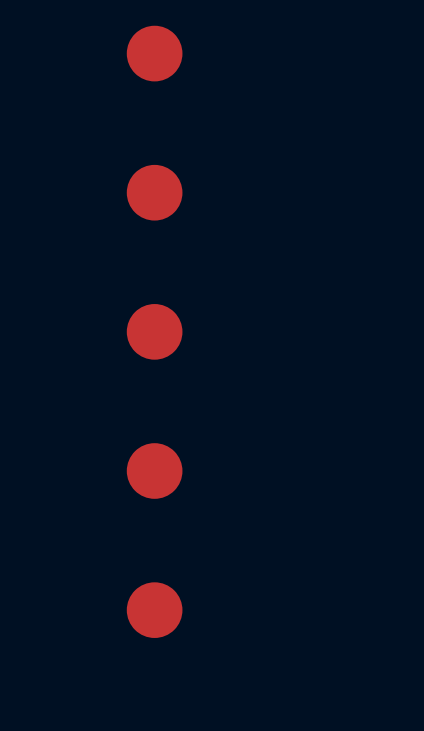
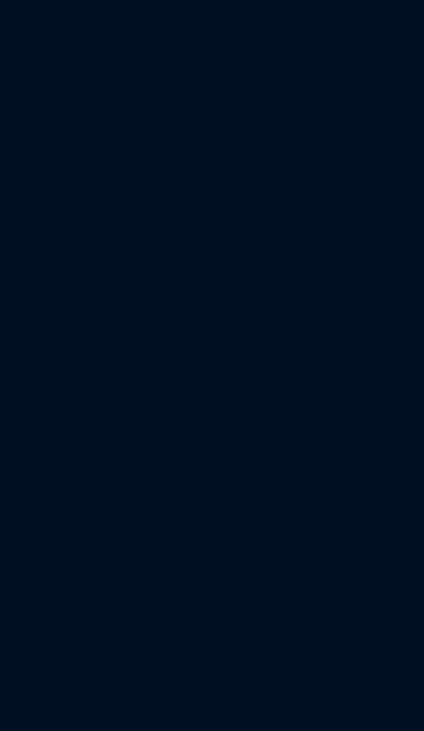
part: (154, 53) -> none
part: (154, 192) -> none
part: (154, 331) -> none
part: (154, 471) -> none
part: (154, 610) -> none

